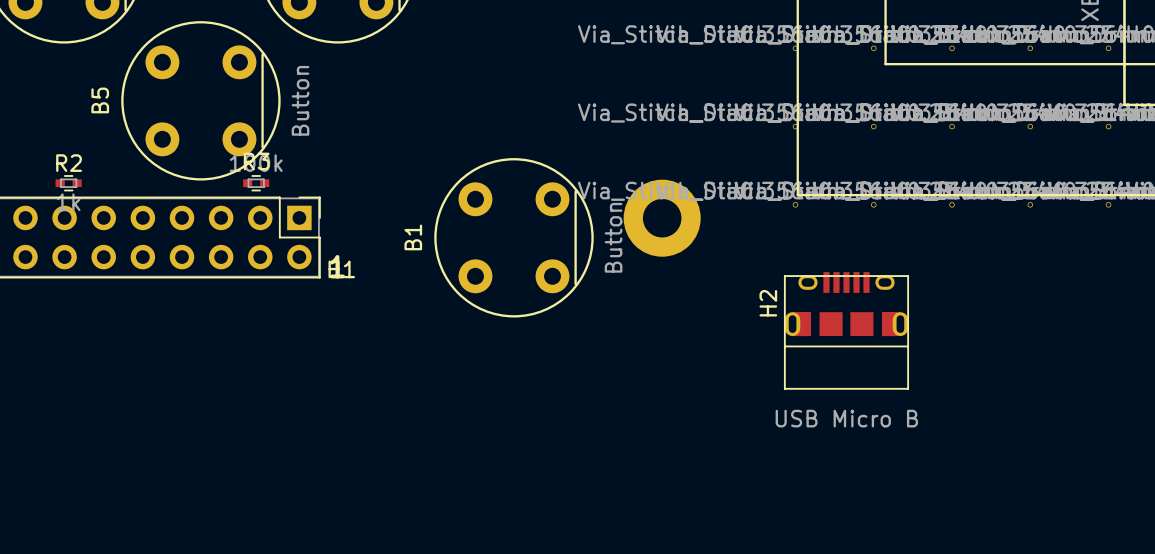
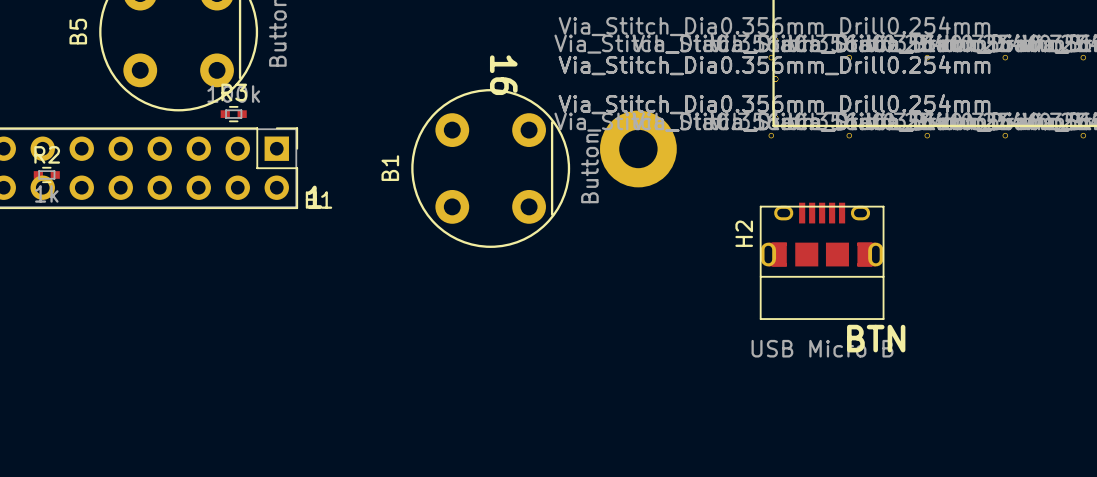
part: none -> Via_Stitch_Dia0.356mm_Drill0.254mm (775, 40)
text: none -> 16 (503, 75)
part: none -> Via_Stitch_Dia0.356mm_Drill0.254mm (775, 79)
R2 position: (68, 183) -> (46, 174)
part: none -> Via_Stitch_Dia0.356mm_Drill0.254mm (775, 118)
text: none -> BTN (876, 338)

